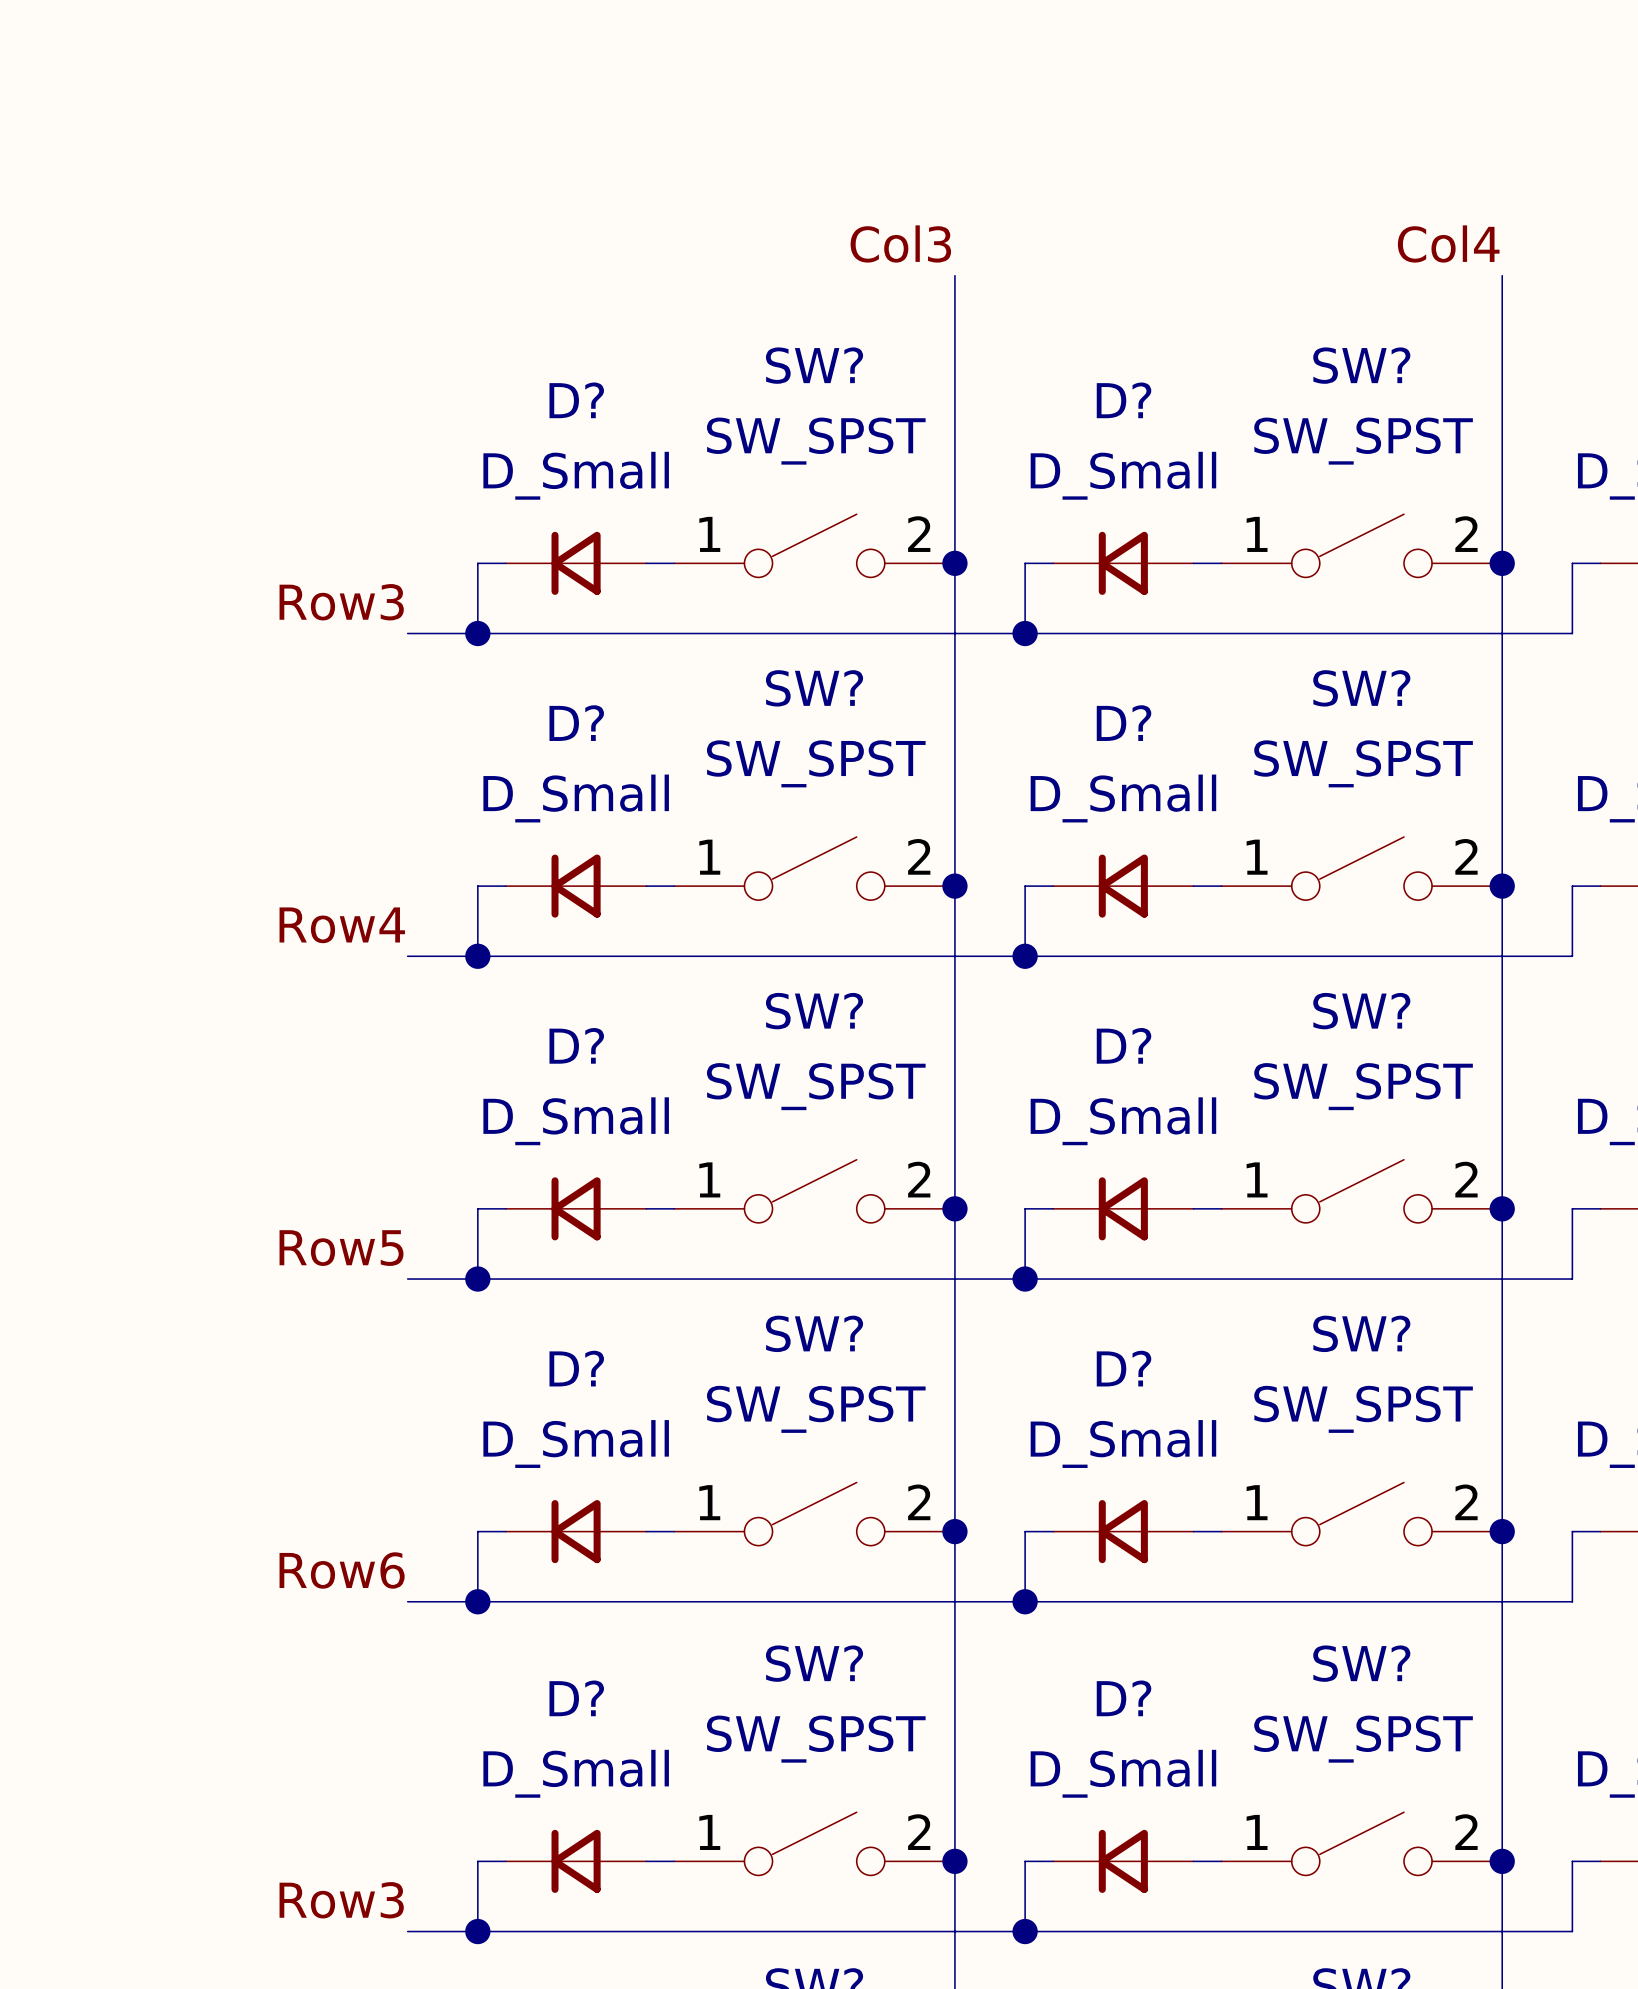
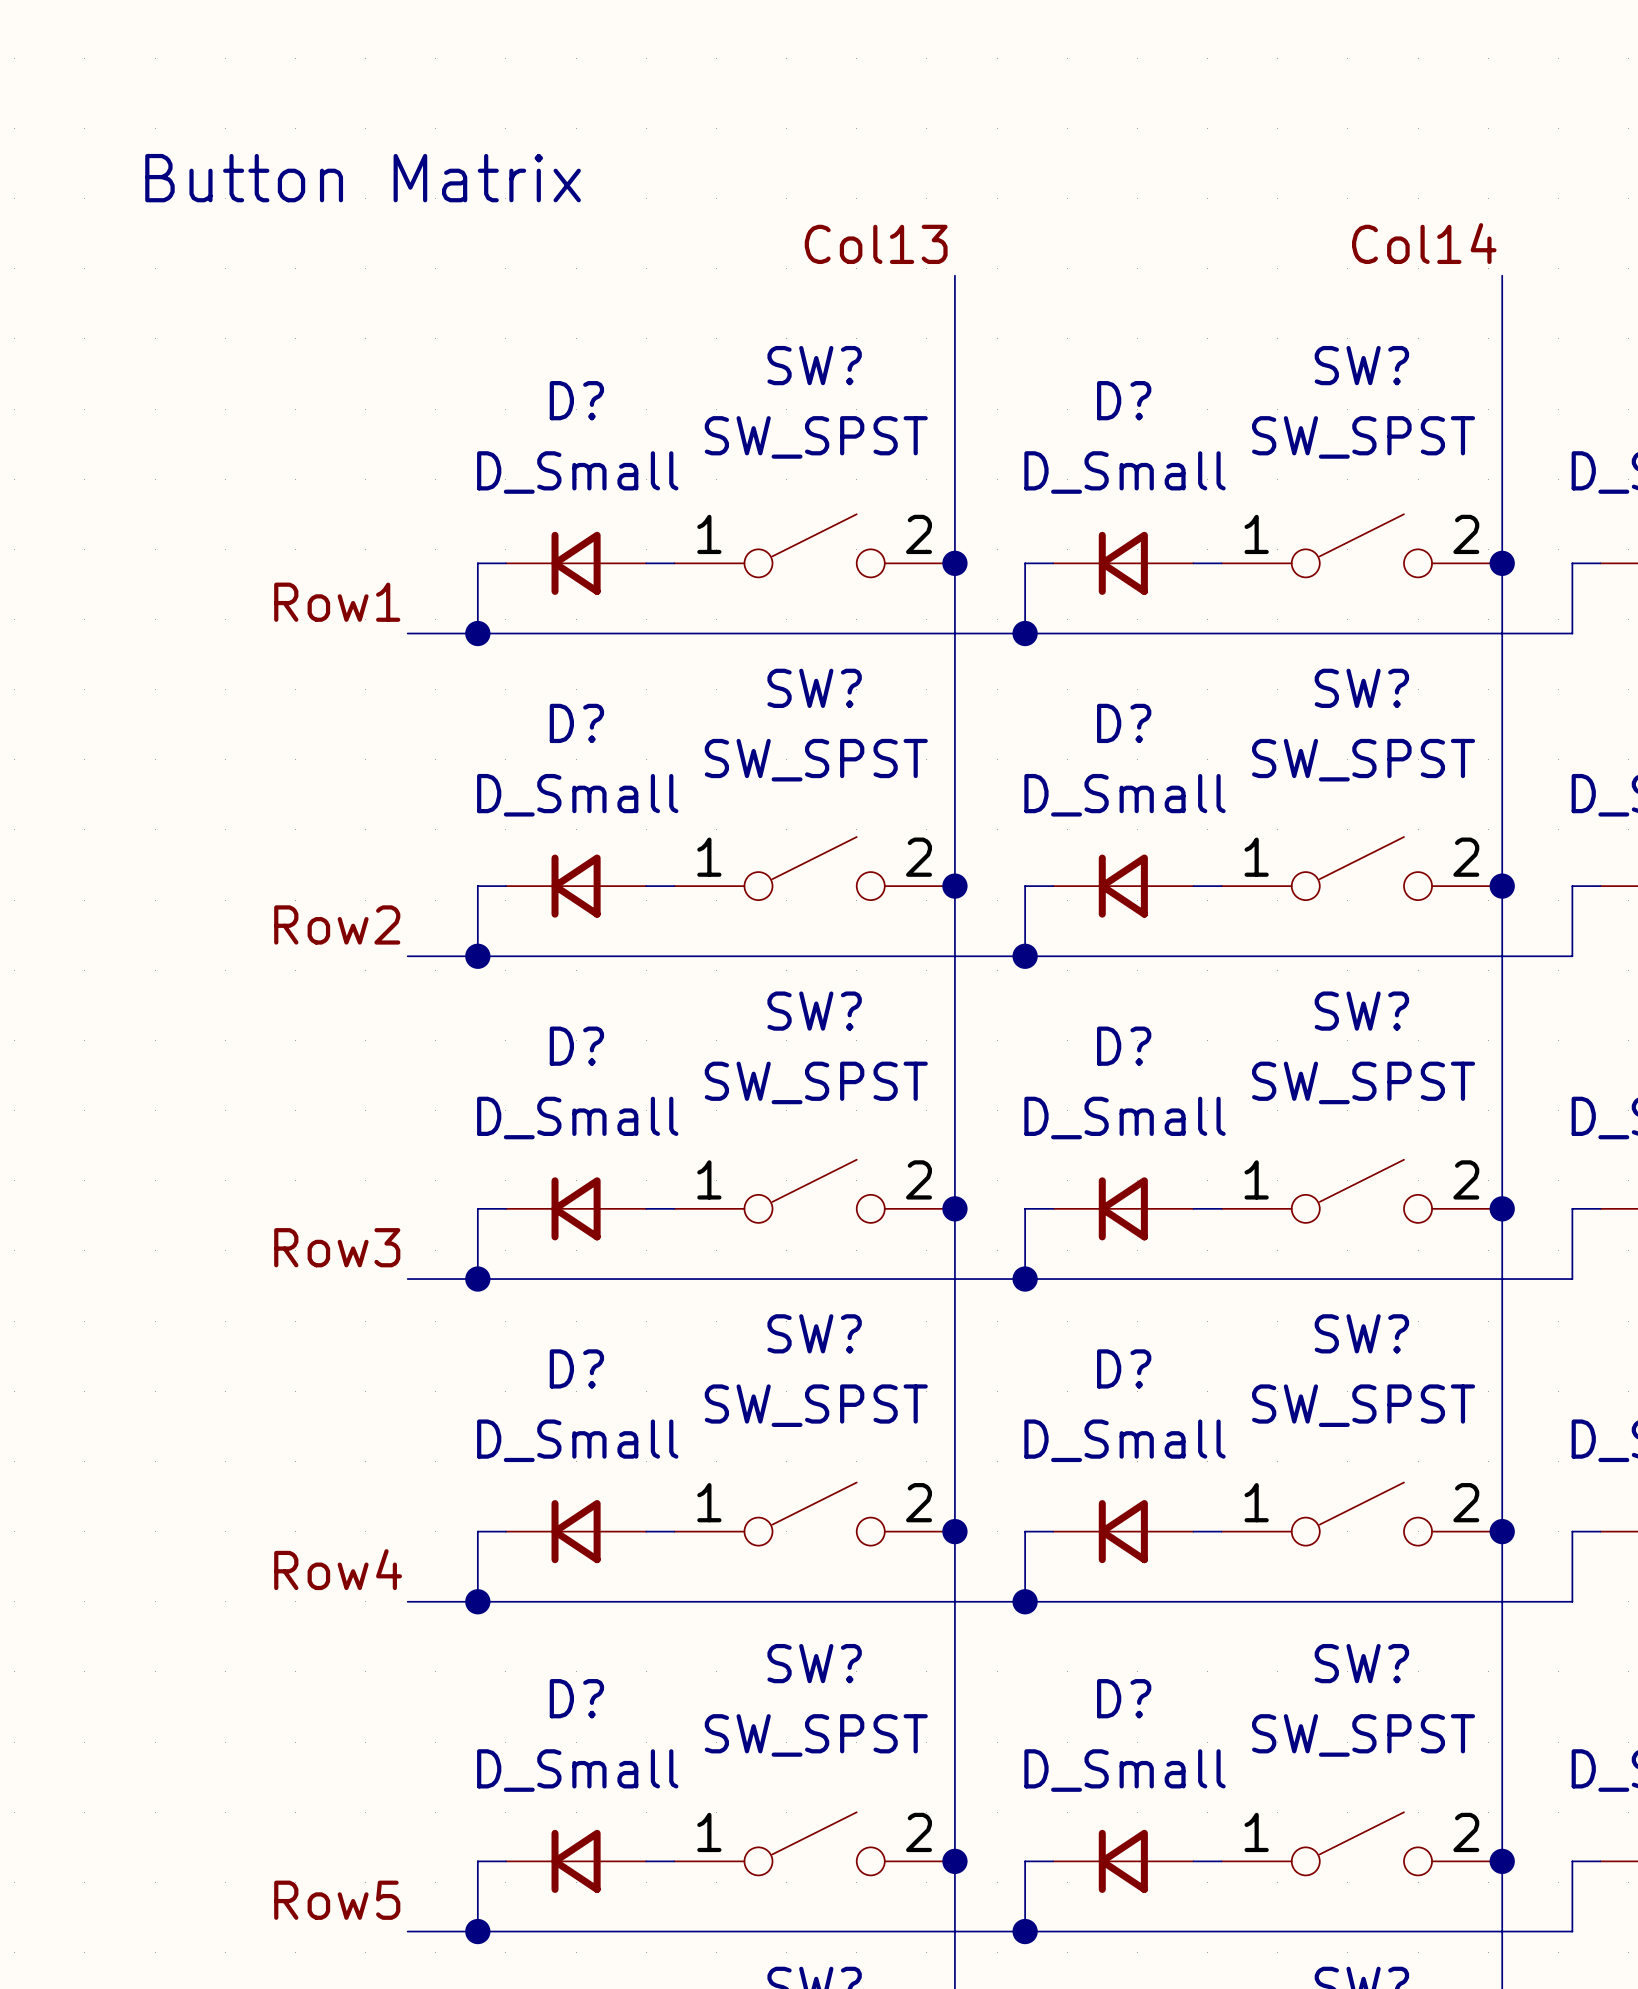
text: none -> Button Matrix (363, 178)
label: Col3 (900, 243) -> Col13 (876, 244)
label: Col4 (1448, 243) -> Col14 (1424, 243)
label: Row3 (341, 602) -> Row1 (337, 602)
label: Row4 (342, 925) -> Row2 (337, 924)
label: Row5 (341, 1248) -> Row3 (337, 1247)
label: Row6 (342, 1570) -> Row4 (338, 1569)
label: Row3 (341, 1900) -> Row5 (337, 1900)

